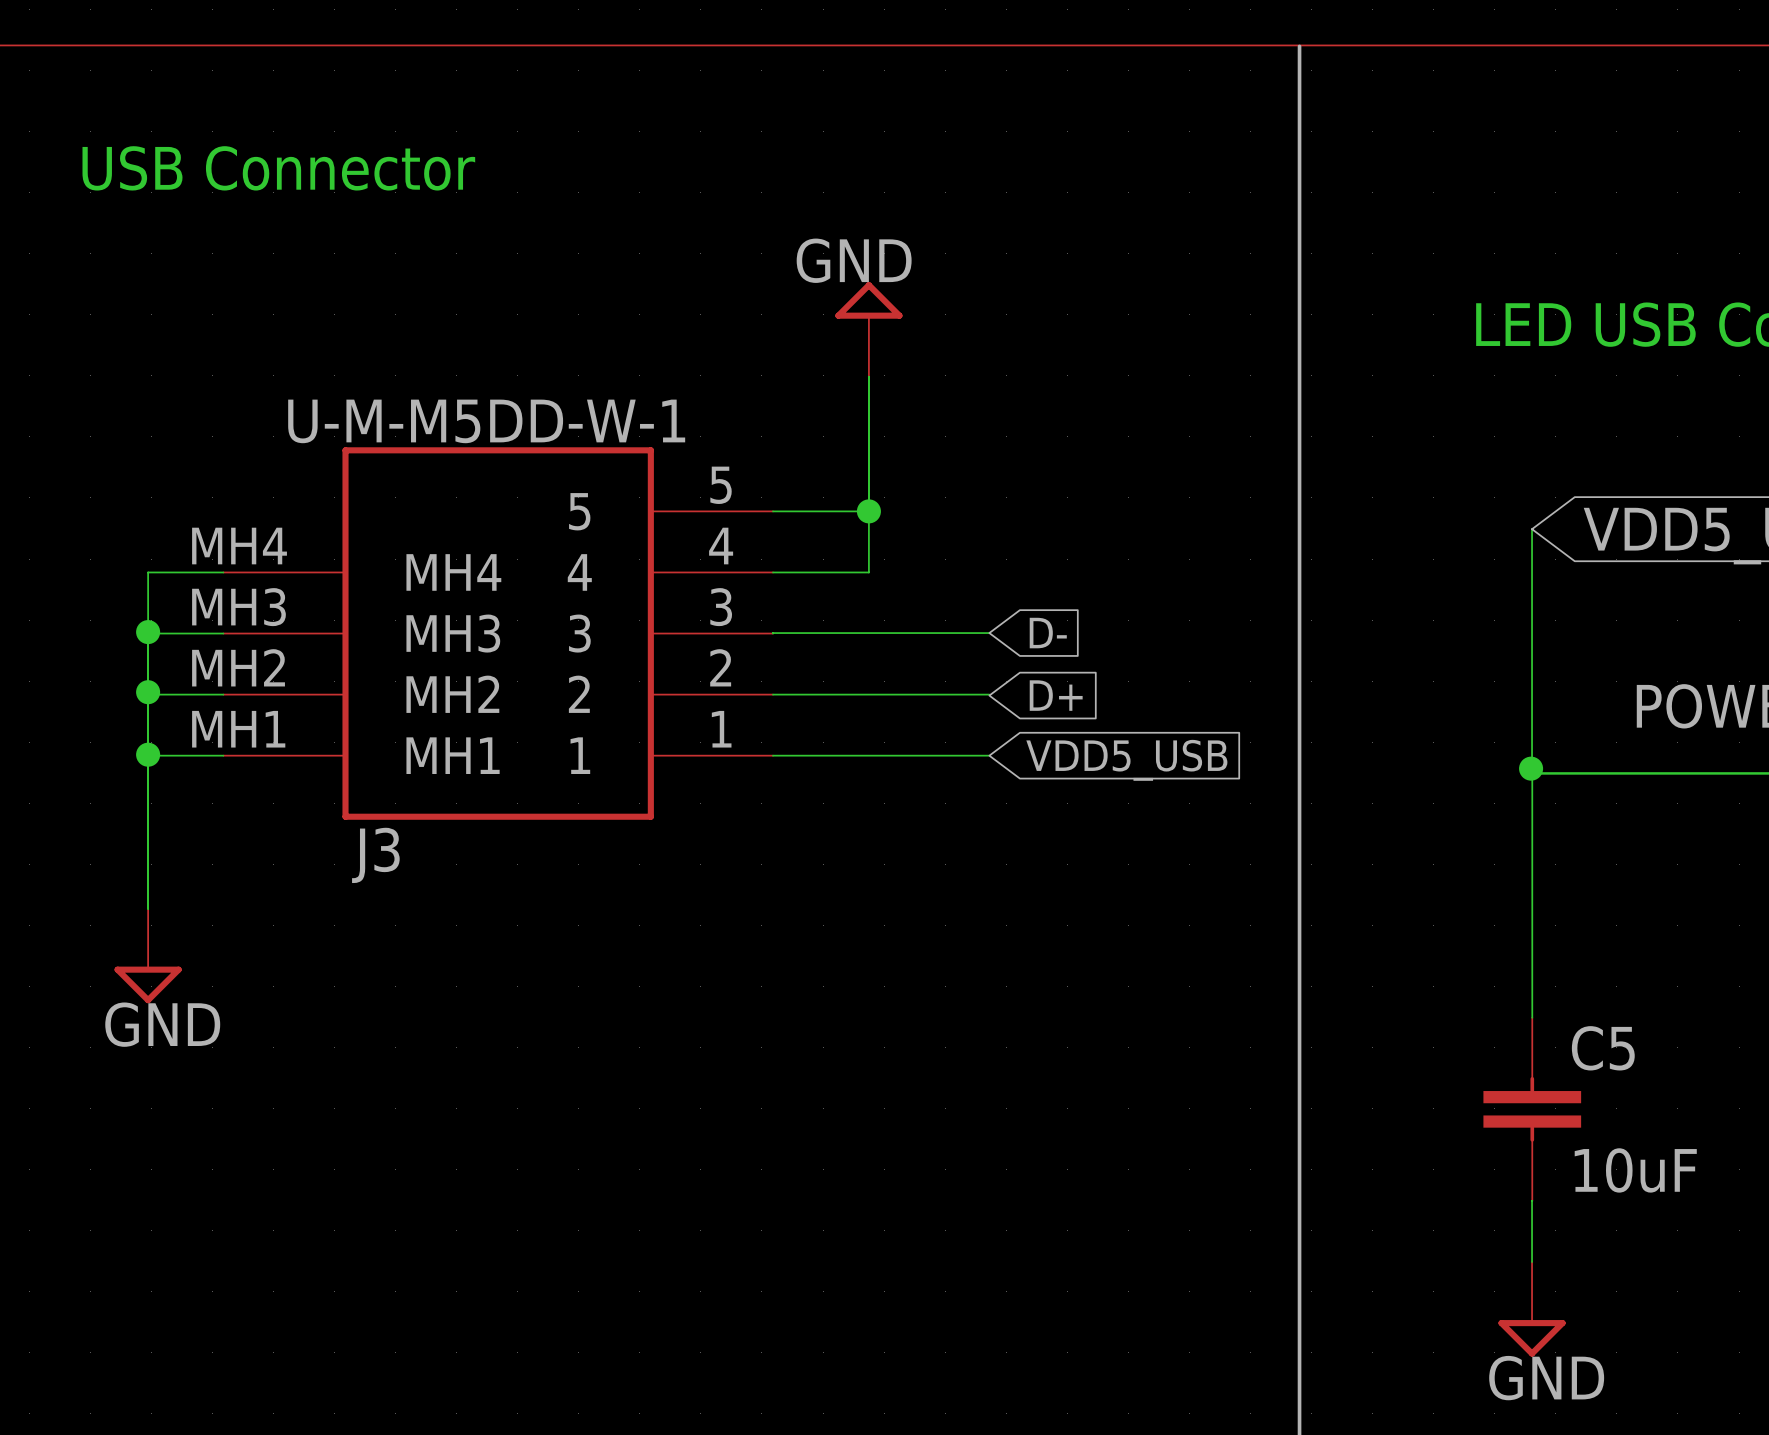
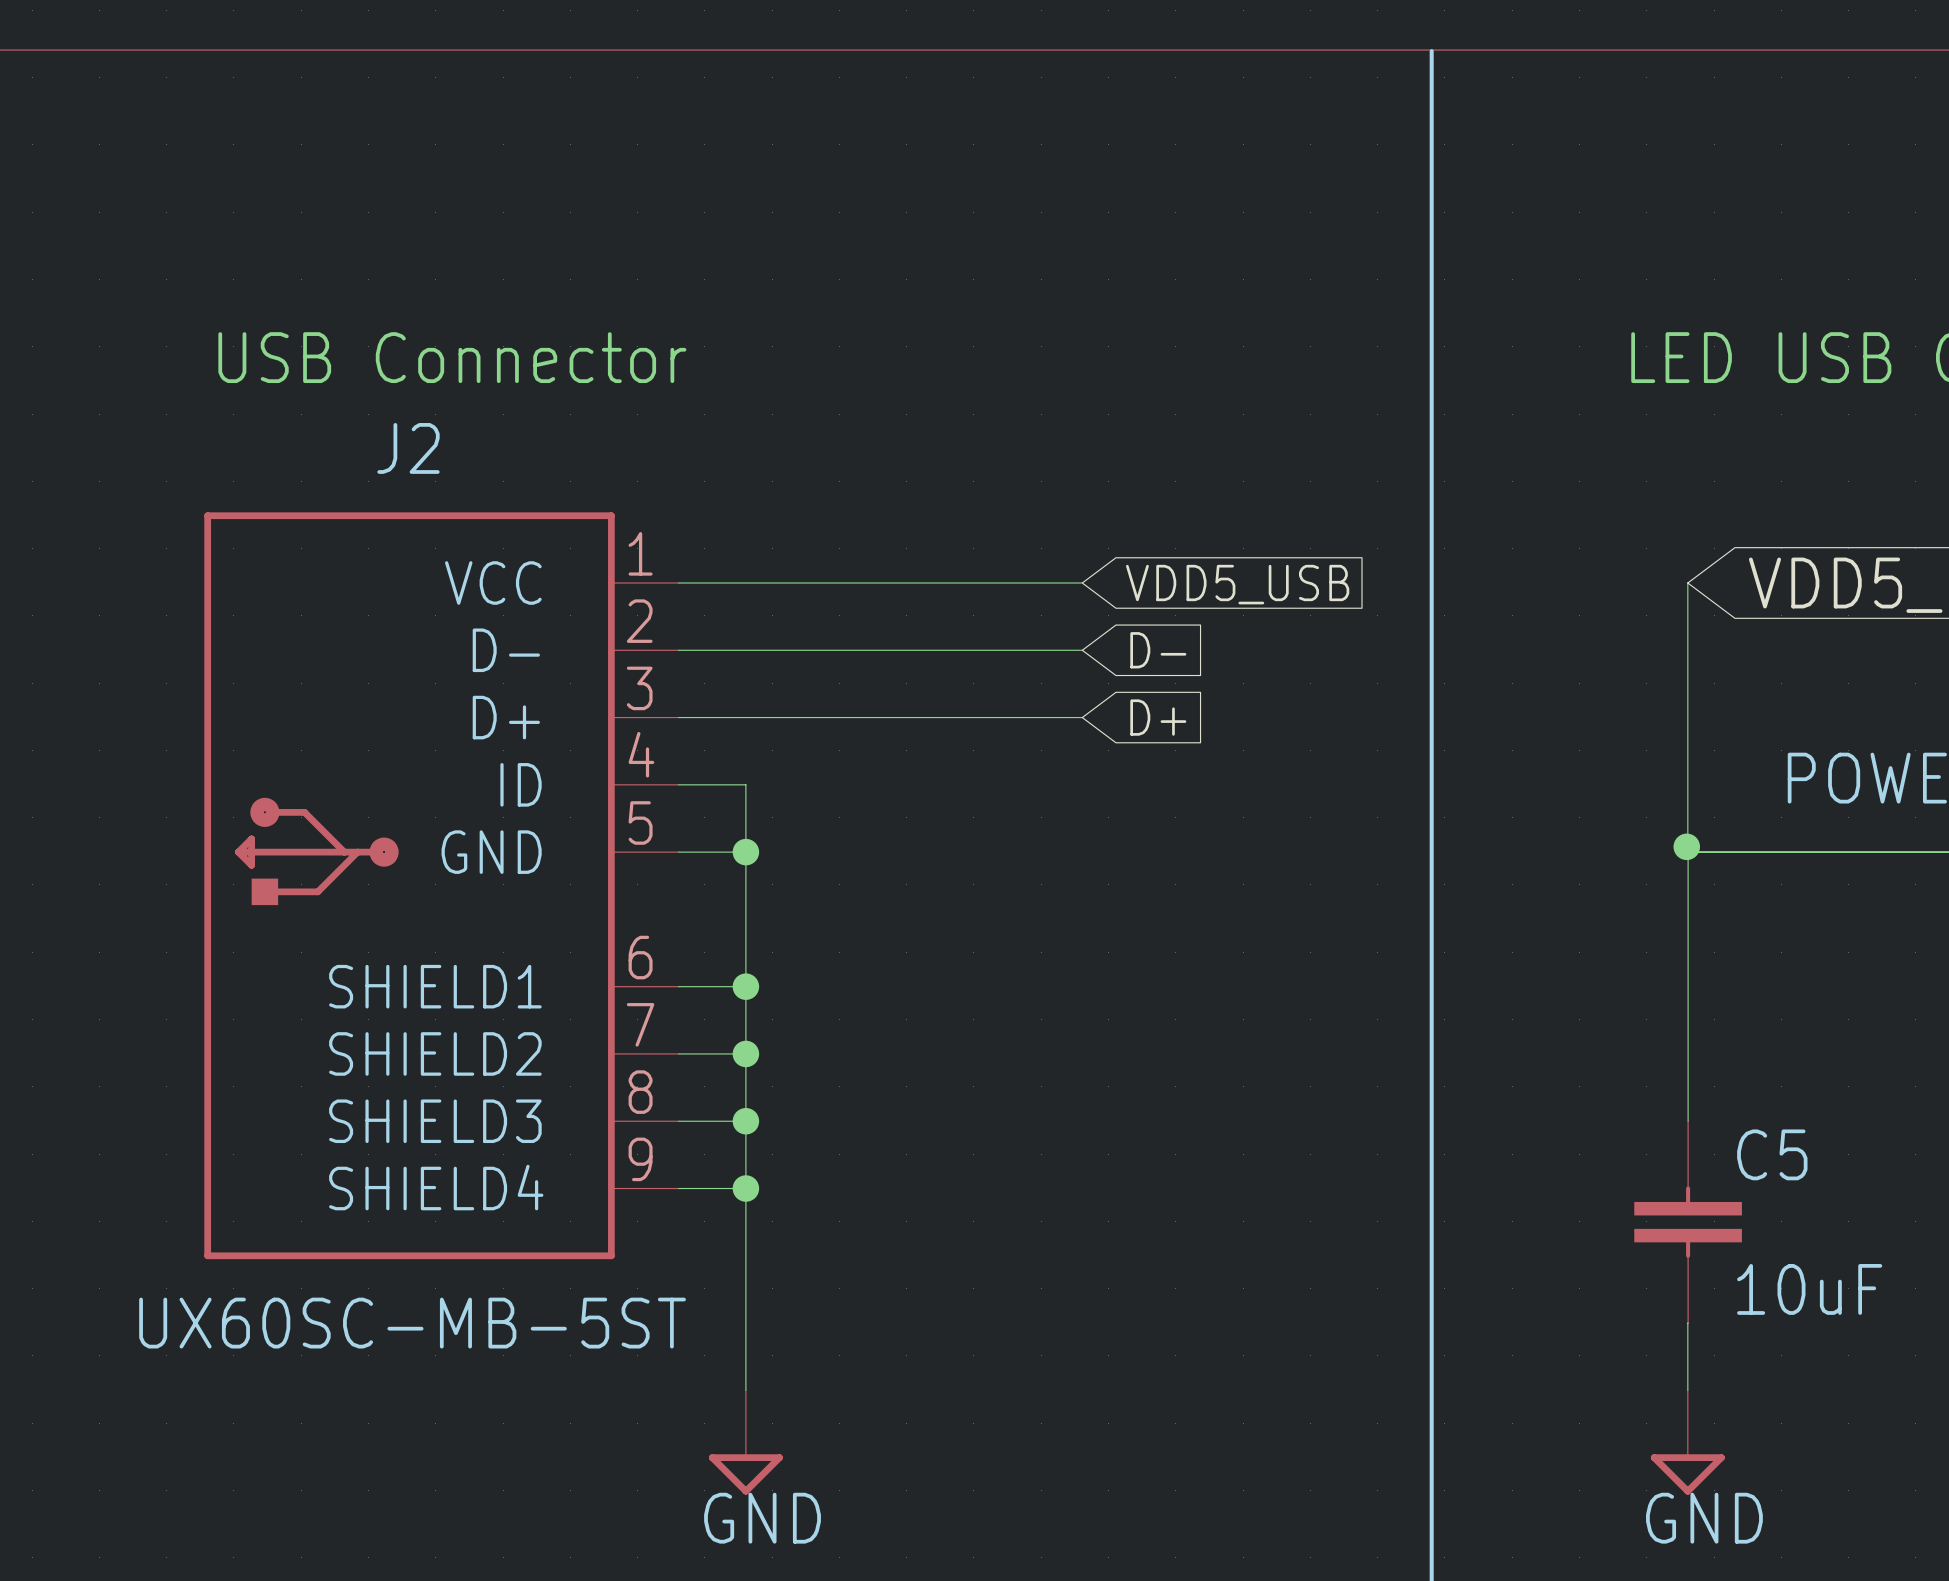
text position: USB Connector (278, 168) -> USB Connector (452, 357)
power symbol: GND (868, 329) -> none
wire: (868, 376) (868, 572) (772, 572) -> none
wire: (772, 511) (868, 511) -> none
junction: (868, 511) -> none
wire: none -> (678, 583) (1082, 583)
wire: (223, 572) (148, 572) (148, 908) -> none
wire: none -> (678, 650) (1082, 650)
junction: (148, 632) -> none
wire: (148, 633) (223, 633) -> none
J3: U-M-M5DD-W-1 (498, 633) -> none
wire: (772, 633) (989, 633) -> none
global label position: D- (1048, 633) -> D- (1158, 650)
wire: none -> (678, 717) (1082, 717)
junction: (148, 692) -> none
wire: (148, 694) (223, 694) -> none
wire: (772, 694) (989, 694) -> none
global label position: D+ (1056, 695) -> D+ (1158, 717)
wire: none -> (678, 784) (745, 784) (745, 1390)
junction: (148, 754) -> none
wire: (148, 755) (223, 755) -> none
wire: (772, 755) (989, 755) -> none
global label position: VDD5_USB (1126, 760) -> VDD5_USB (1237, 584)
wire: none -> (678, 852) (745, 852)
junction: none -> (745, 852)
J2: none -> UX60SC-MB-5ST (441, 885)
wire: none -> (678, 986) (745, 986)
junction: none -> (745, 986)
power symbol: GND (148, 955) -> none
wire: none -> (678, 1053) (745, 1053)
junction: none -> (745, 1053)
wire: none -> (678, 1121) (745, 1121)
junction: none -> (745, 1121)
wire: none -> (678, 1188) (745, 1188)
junction: none -> (745, 1188)
power symbol: none -> GND (745, 1442)

